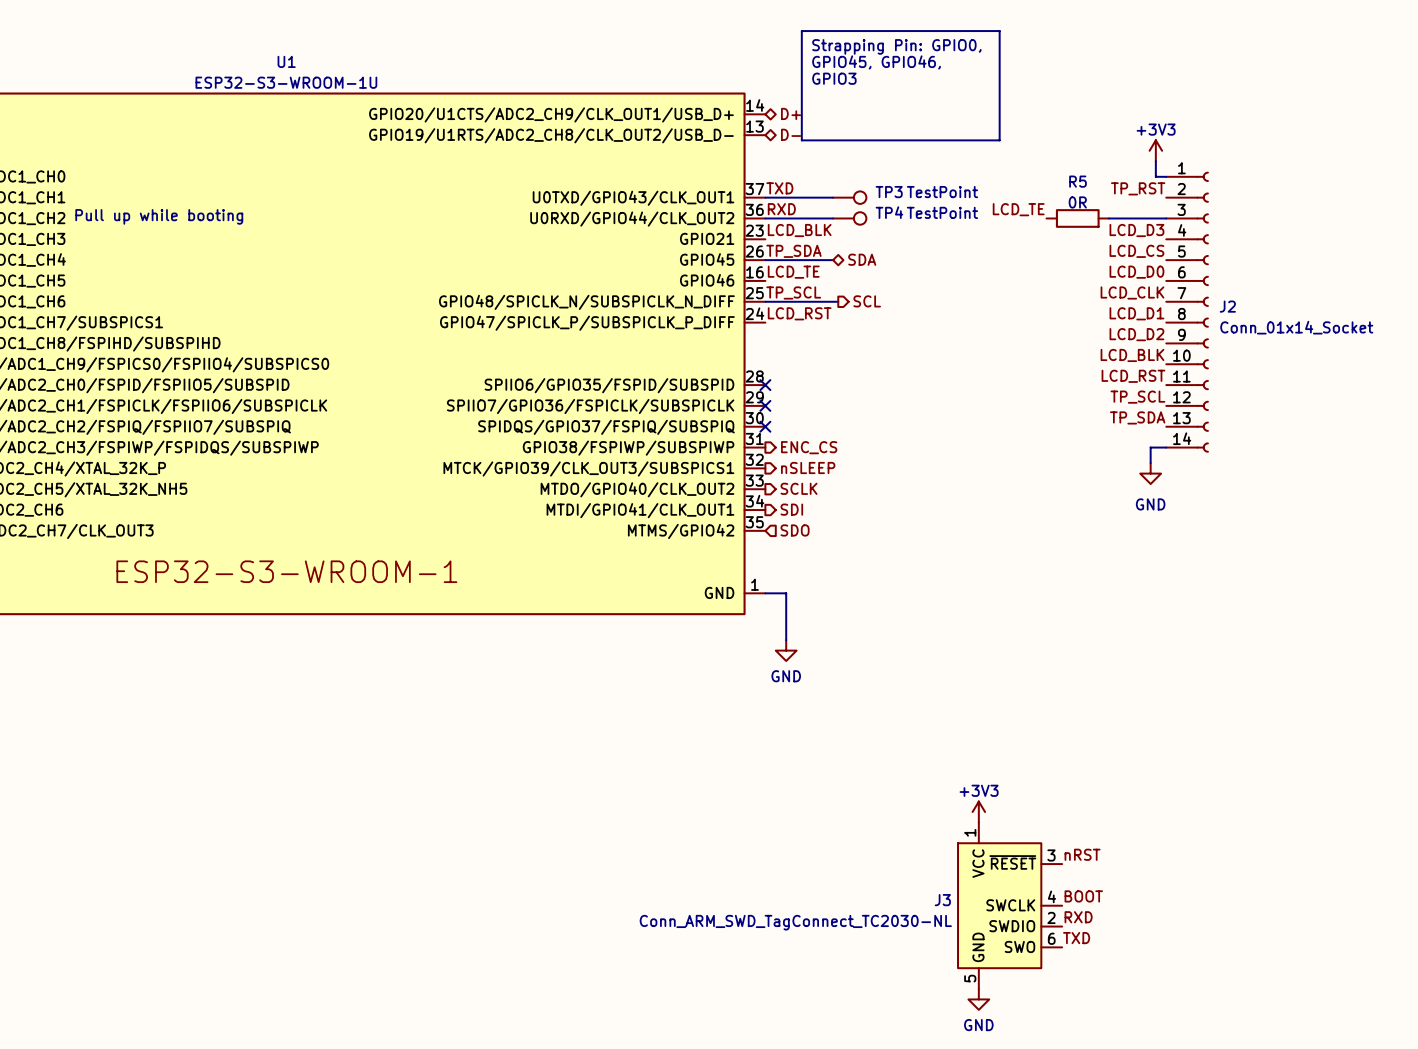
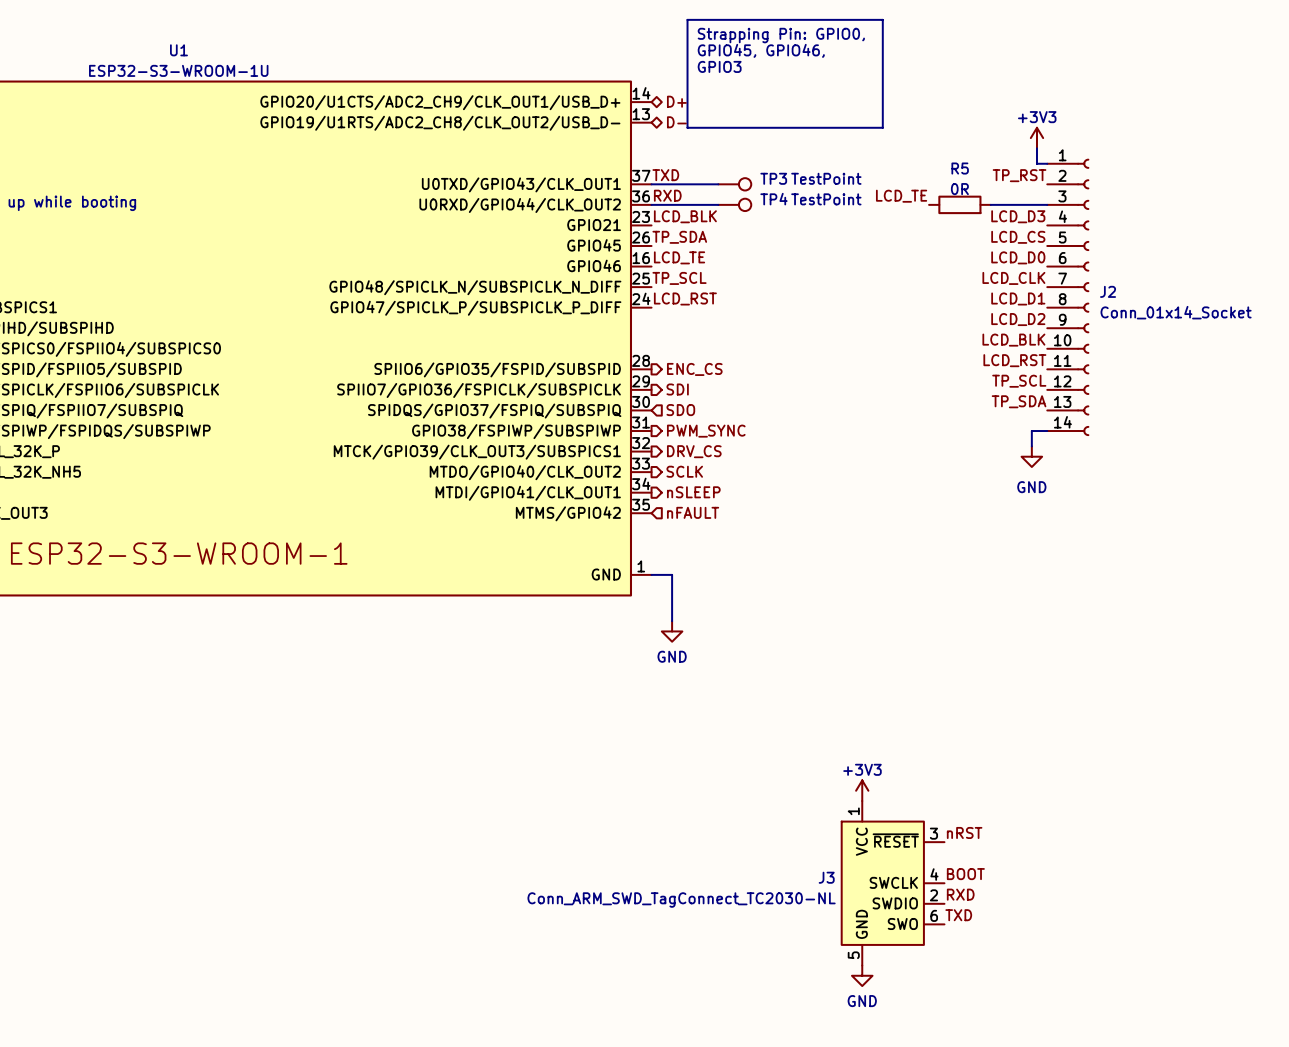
hierarchical label: SDA (862, 259) -> none
wire: (765, 260) (833, 260) -> none
wire: (765, 301) (838, 301) -> none
hierarchical label: SCL (867, 301) -> none
no-connect mark: (765, 385) -> none
hierarchical label: none -> ENC_CS (694, 369)
no-connect mark: (765, 405) -> none
hierarchical label: none -> SDI (677, 389)
no-connect mark: (765, 426) -> none
hierarchical label: none -> SDO (680, 410)
hierarchical label: ENC_CS (809, 447) -> PWM_SYNC (706, 431)
hierarchical label: nSLEEP (808, 467) -> DRV_CS (694, 451)
hierarchical label: SDI (791, 509) -> nSLEEP (693, 492)
hierarchical label: SDO (795, 530) -> nFAULT (693, 512)

